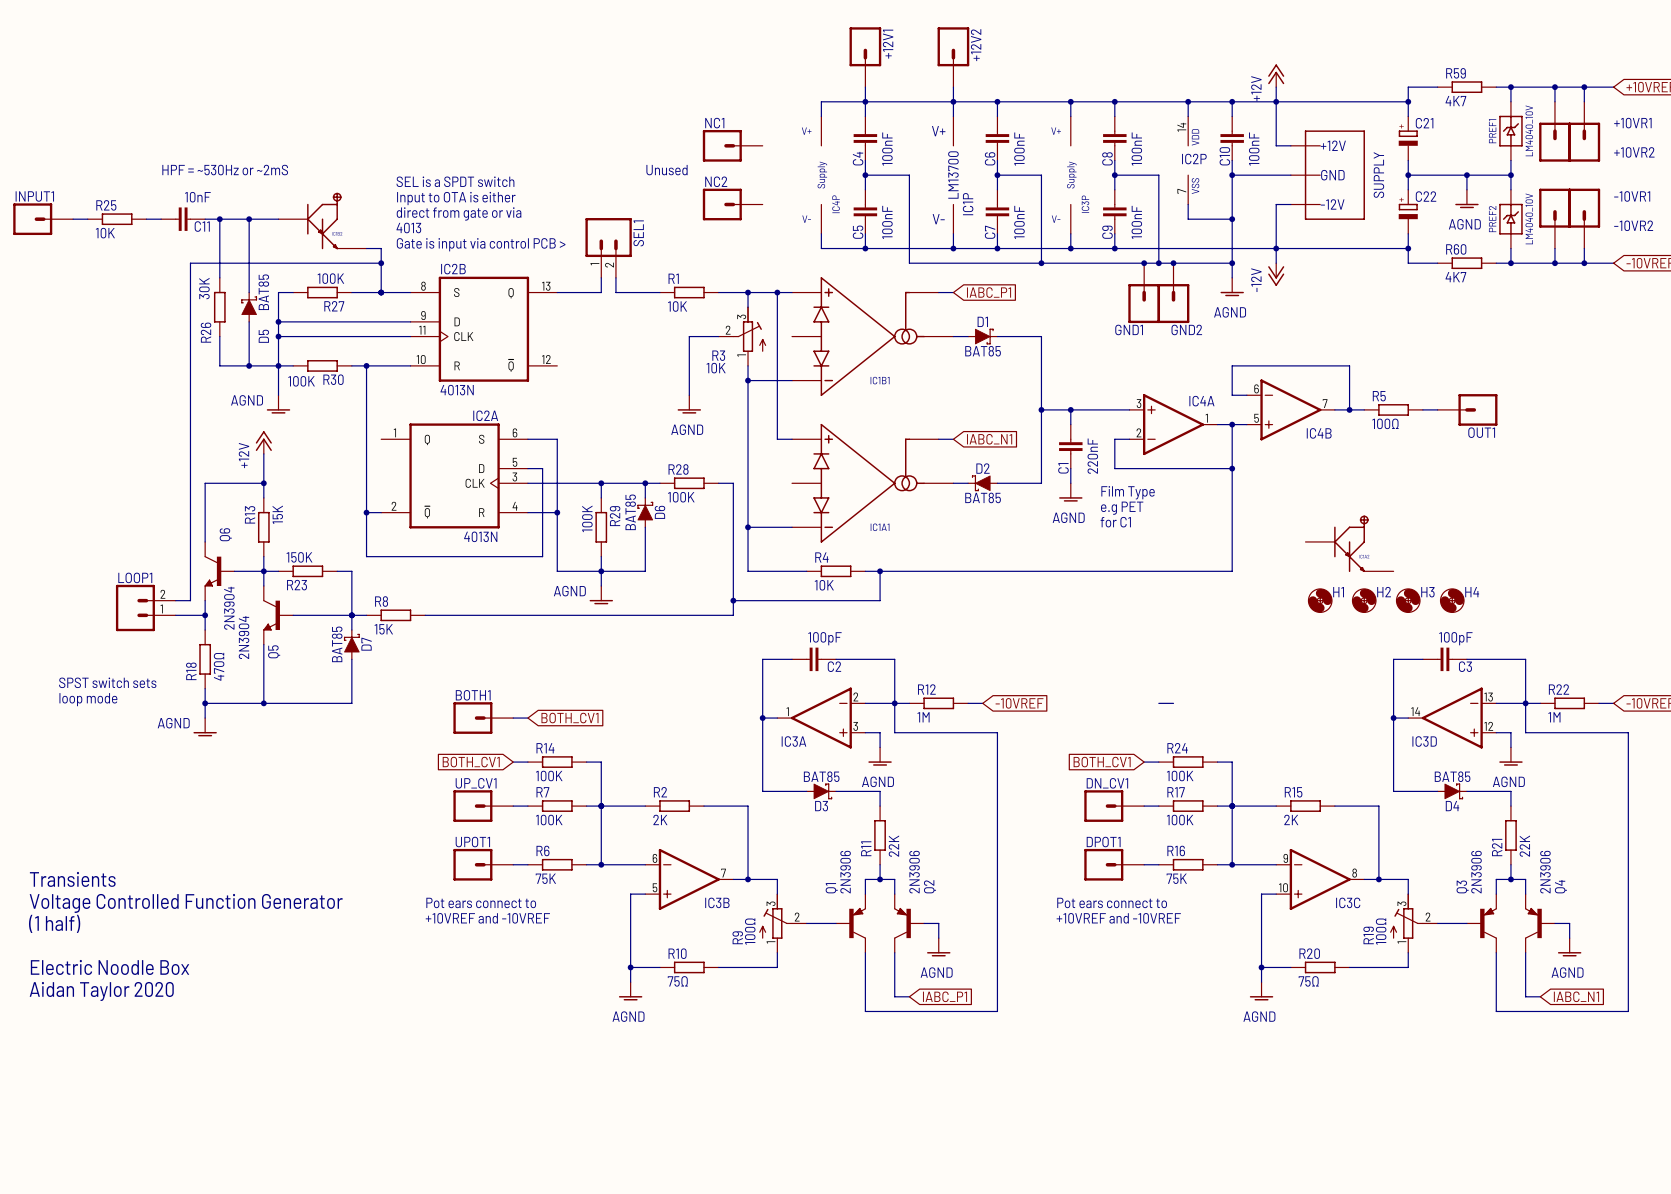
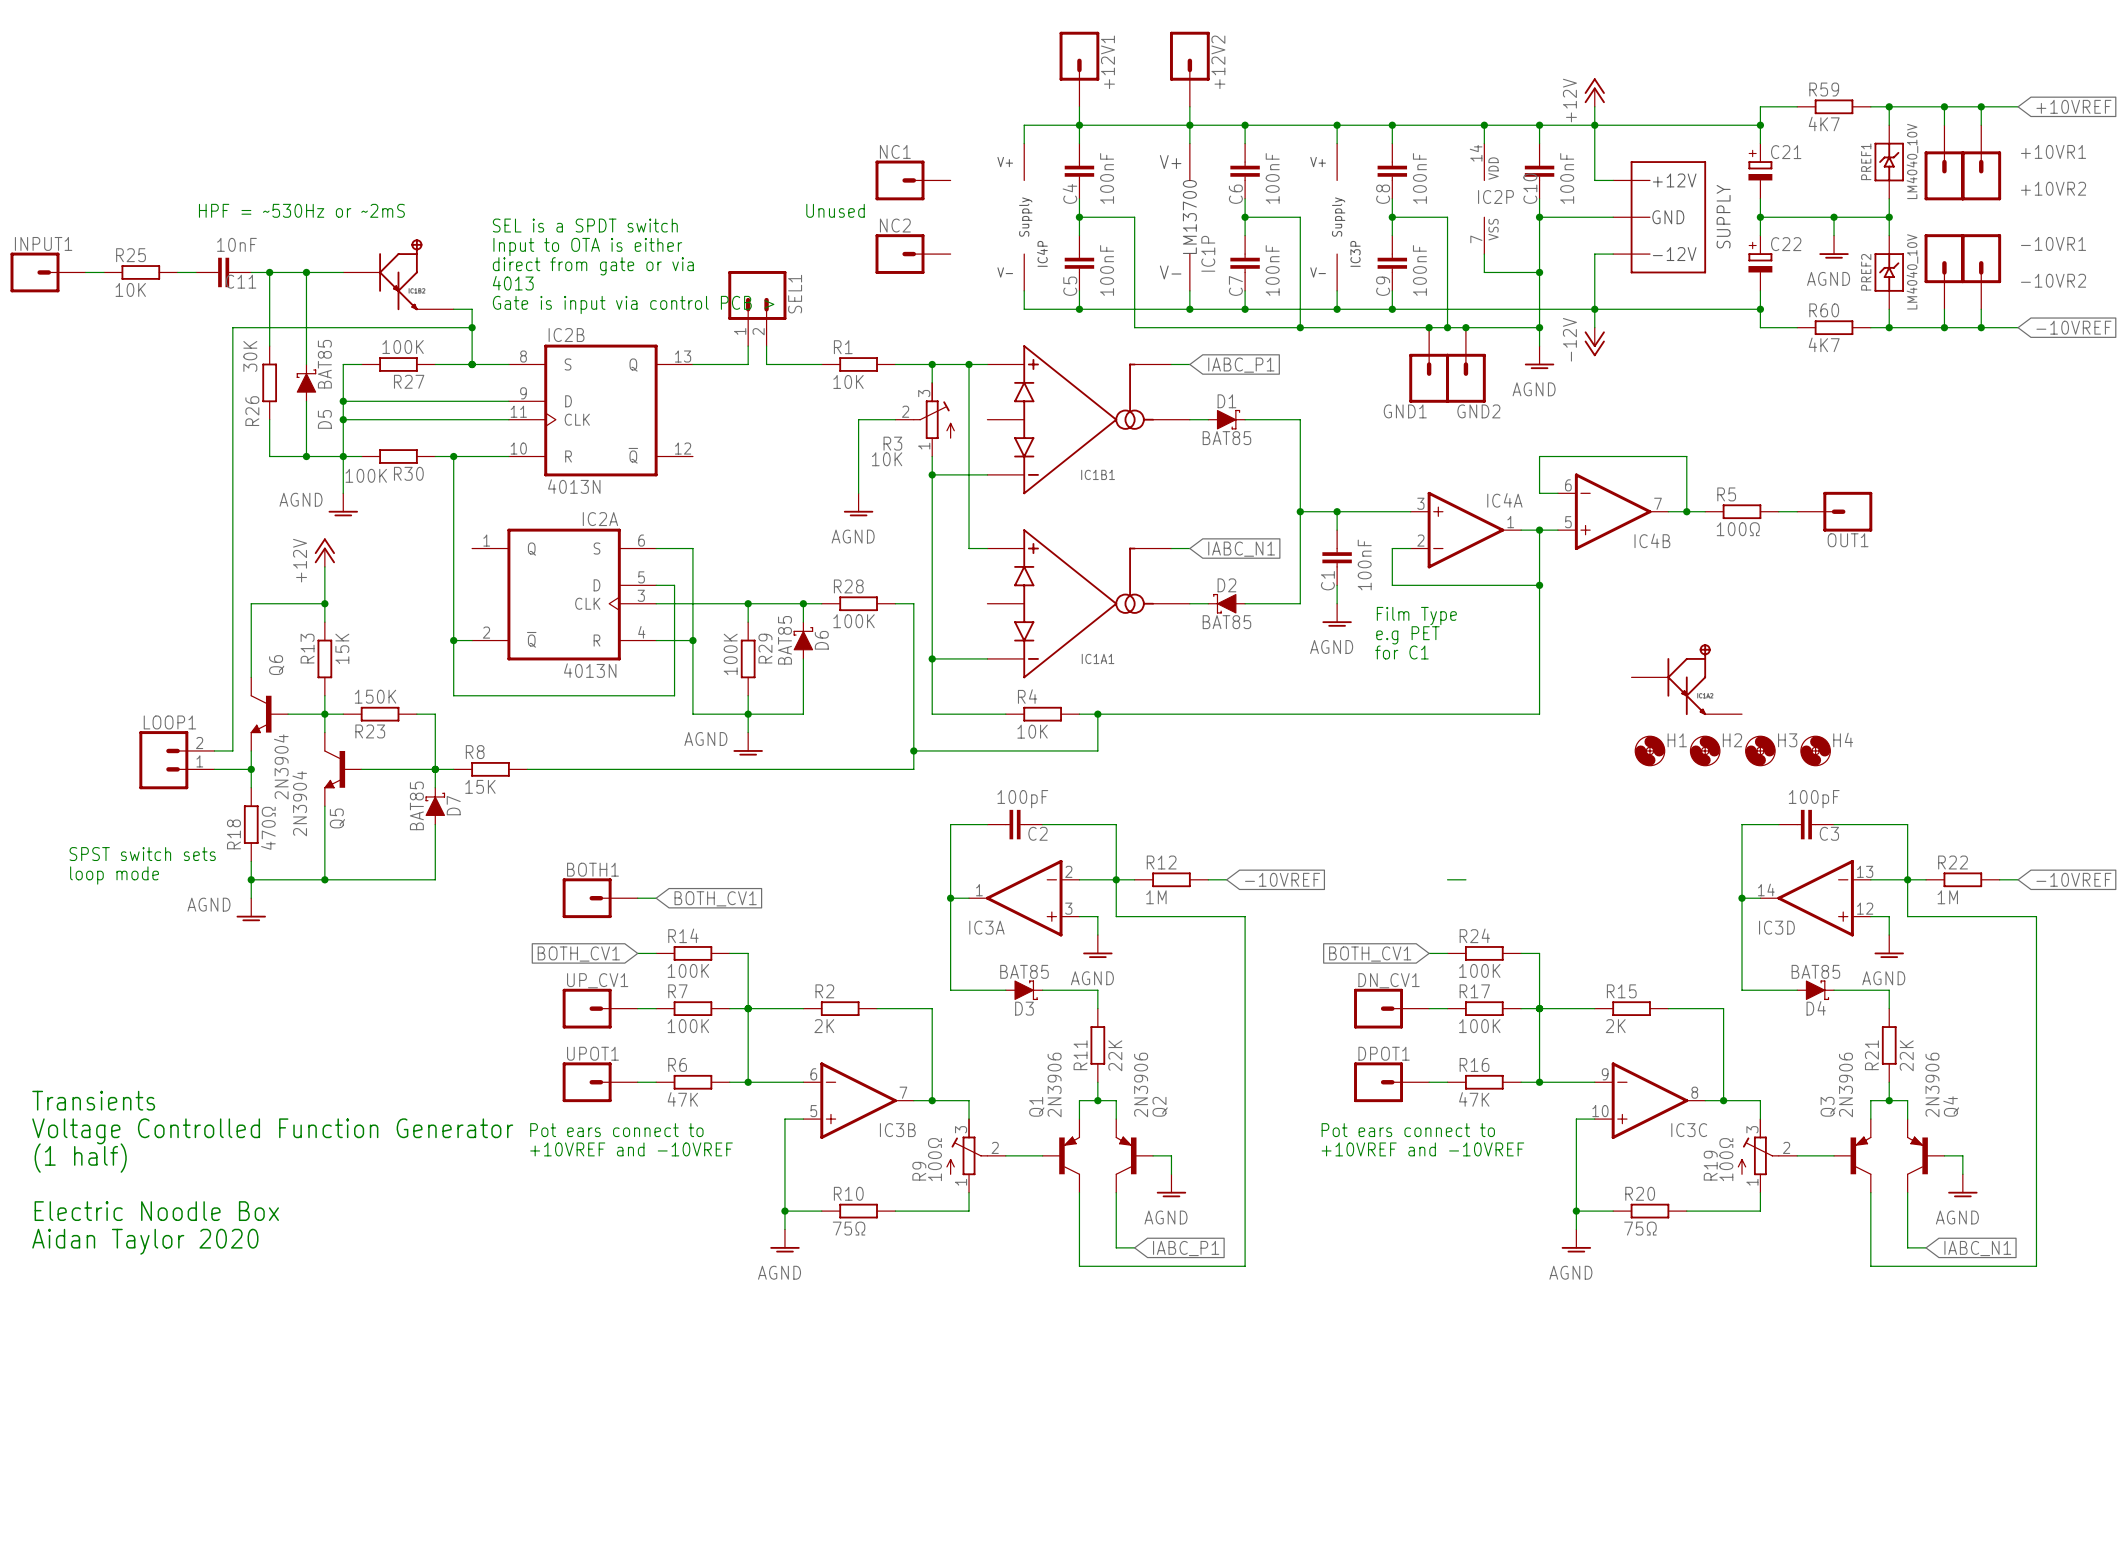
C1 value: 220nF (1092, 456) -> 100nF (1364, 564)
R6 value: 75K (545, 878) -> 47K (682, 1099)
R16 value: 75K (1176, 878) -> 47K (1474, 1099)

